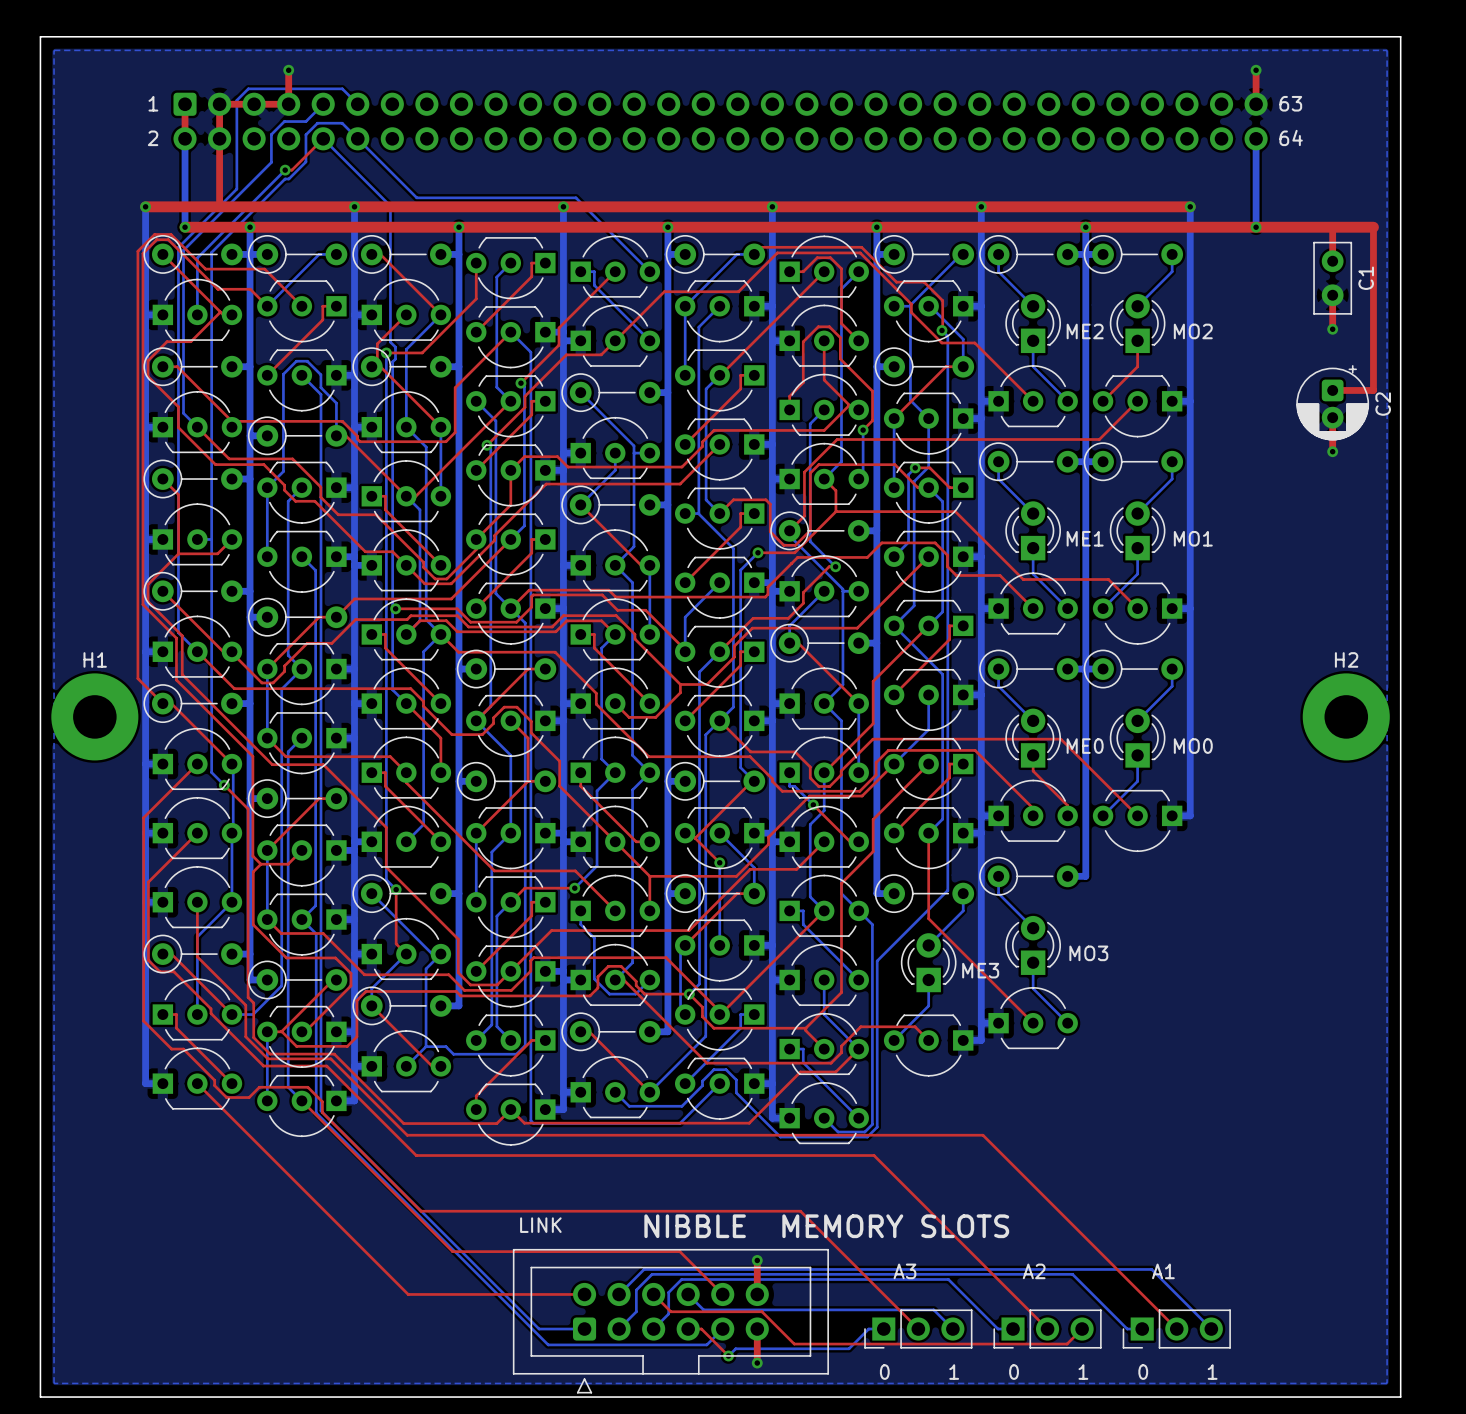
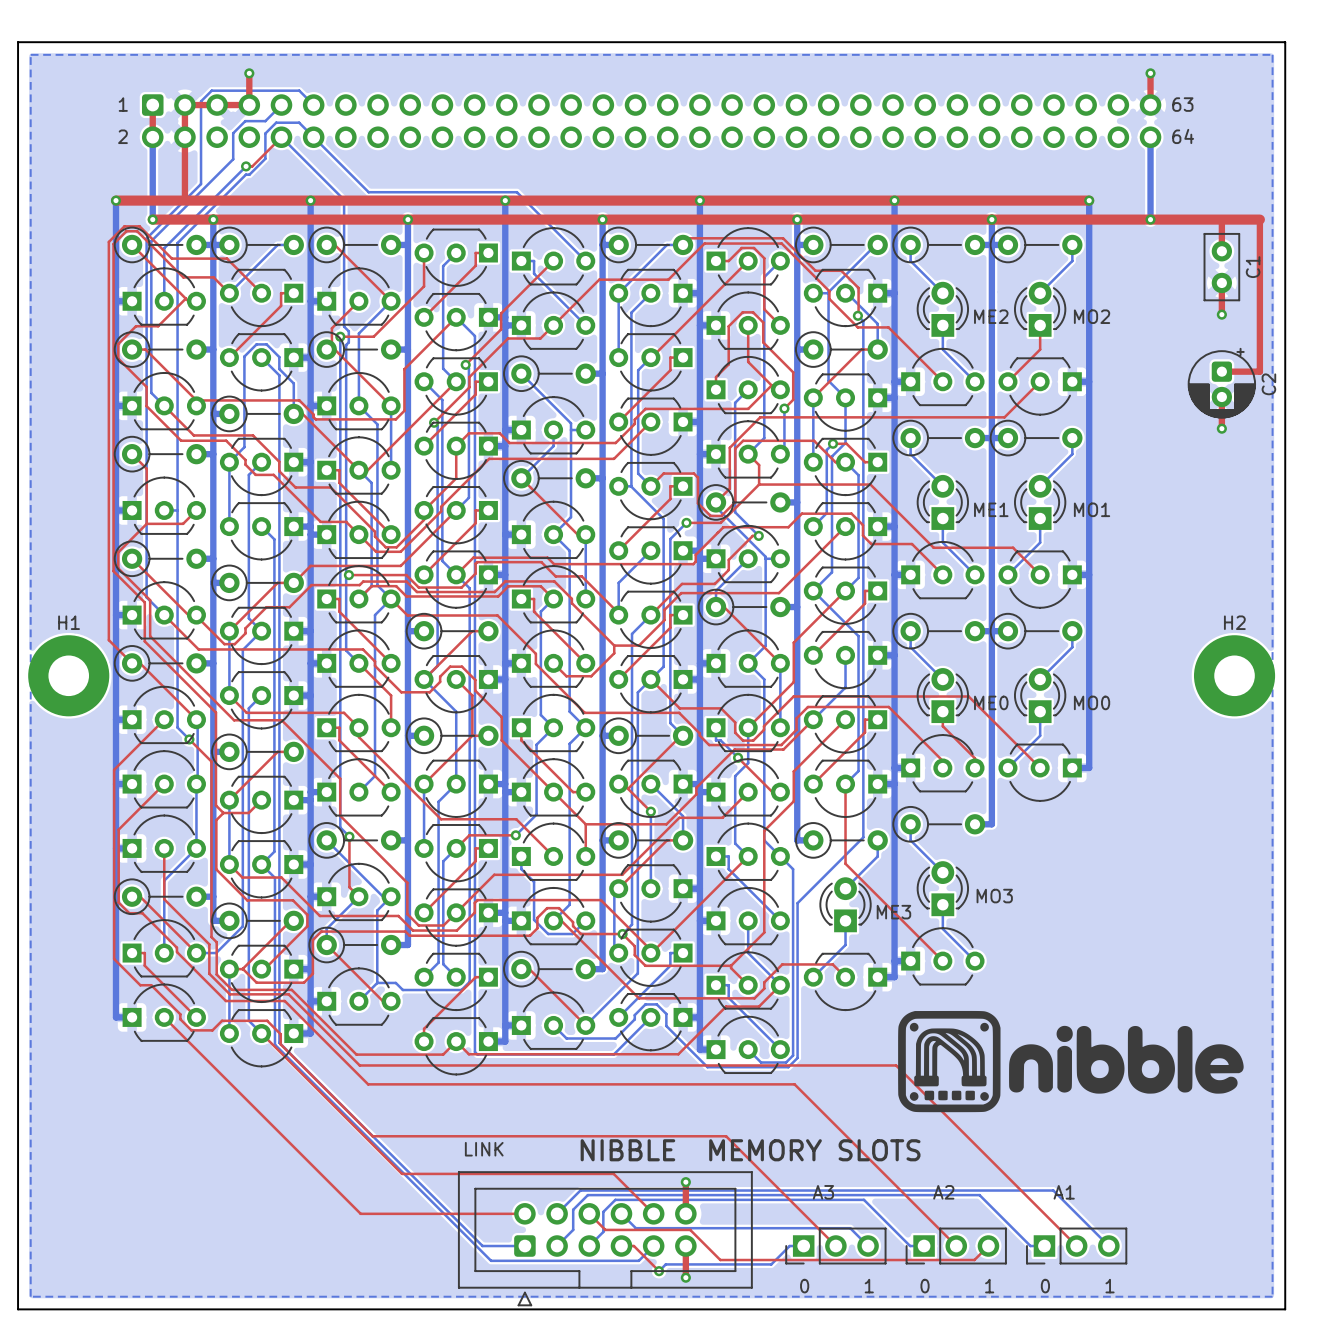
drawing: none -> [898, 1010, 1244, 1113]

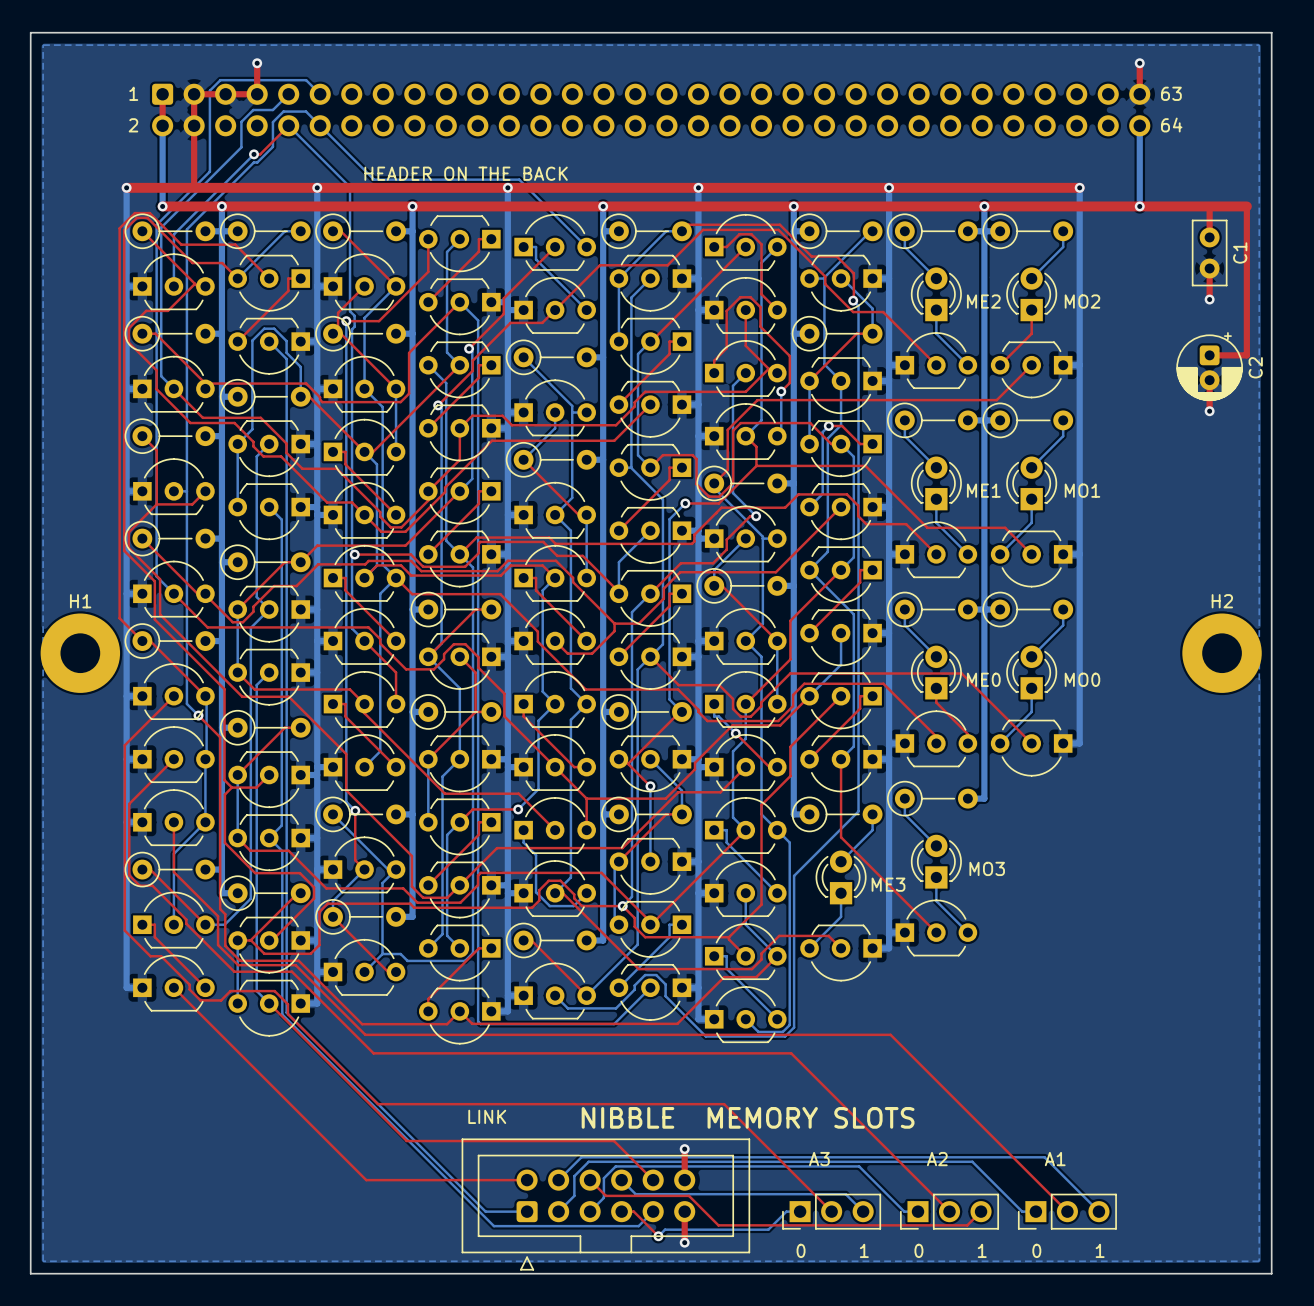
text: none -> HEADER ON THE BACK (466, 173)
drawing: [898, 1010, 1244, 1113] -> none

